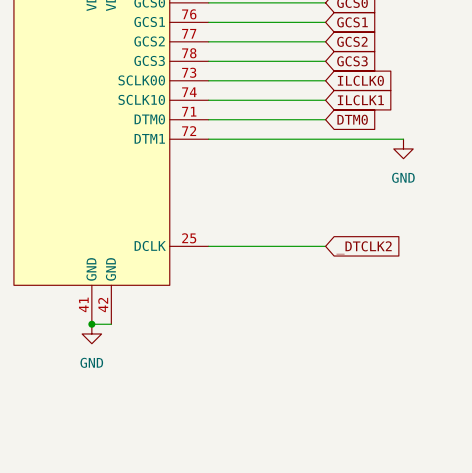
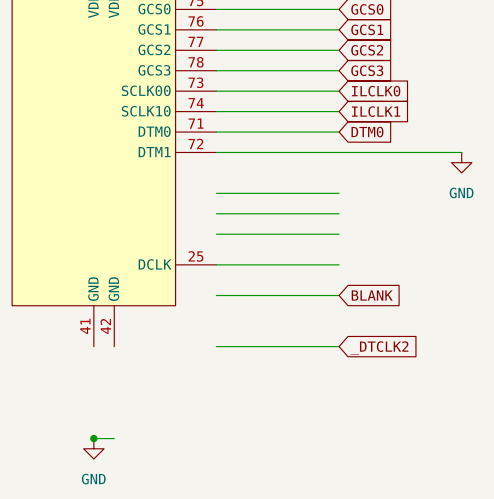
wire: none -> (420, 152) (461, 152)
power symbol position: GND (403, 148) -> GND (461, 162)
wire: none -> (216, 193) (339, 193)
wire: none -> (216, 213) (339, 213)
wire: none -> (216, 234) (339, 234)
global label position: _DTCLK2 (364, 247) -> _DTCLK2 (379, 348)
wire: none -> (216, 295) (339, 295)
global label: none -> BLANK (372, 295)
wire: (91, 324) (111, 324) -> (93, 438) (114, 438)
junction: (91, 324) -> none
wire: none -> (216, 346) (339, 346)
power symbol position: GND (91, 333) -> GND (93, 448)
junction: none -> (93, 438)

